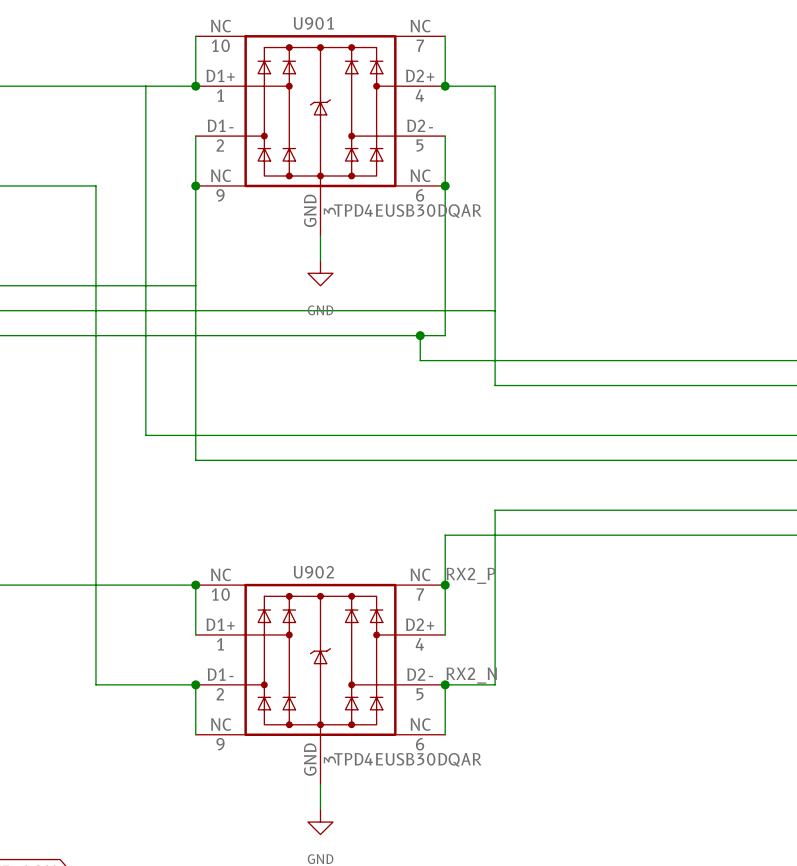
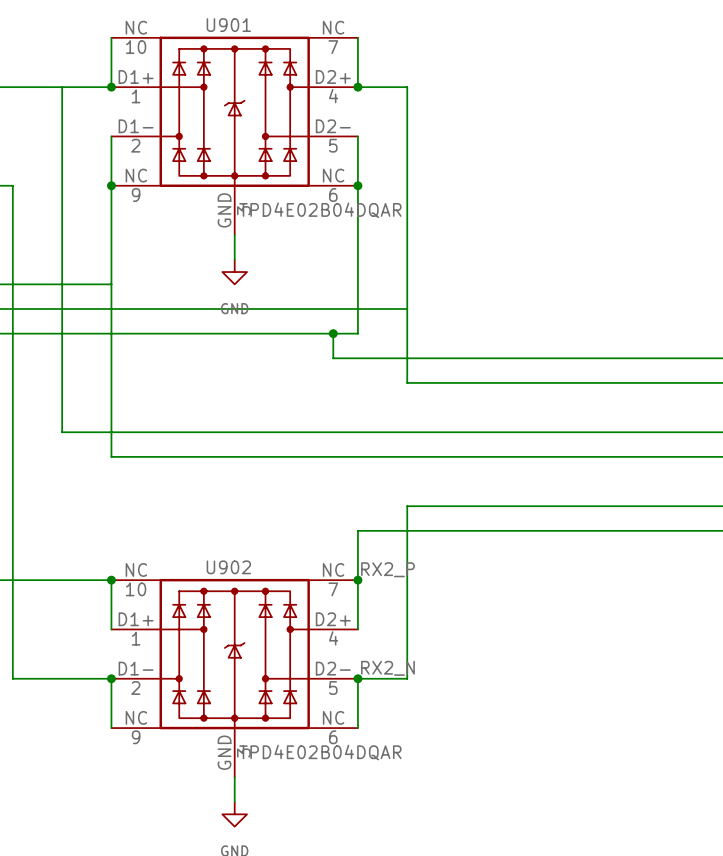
U901 value: TPD4EUSB30DQAR (407, 211) -> TPD4E02B04DQAR (320, 210)
U902 value: TPD4EUSB30DQAR (407, 759) -> TPD4E02B04DQAR (320, 752)

